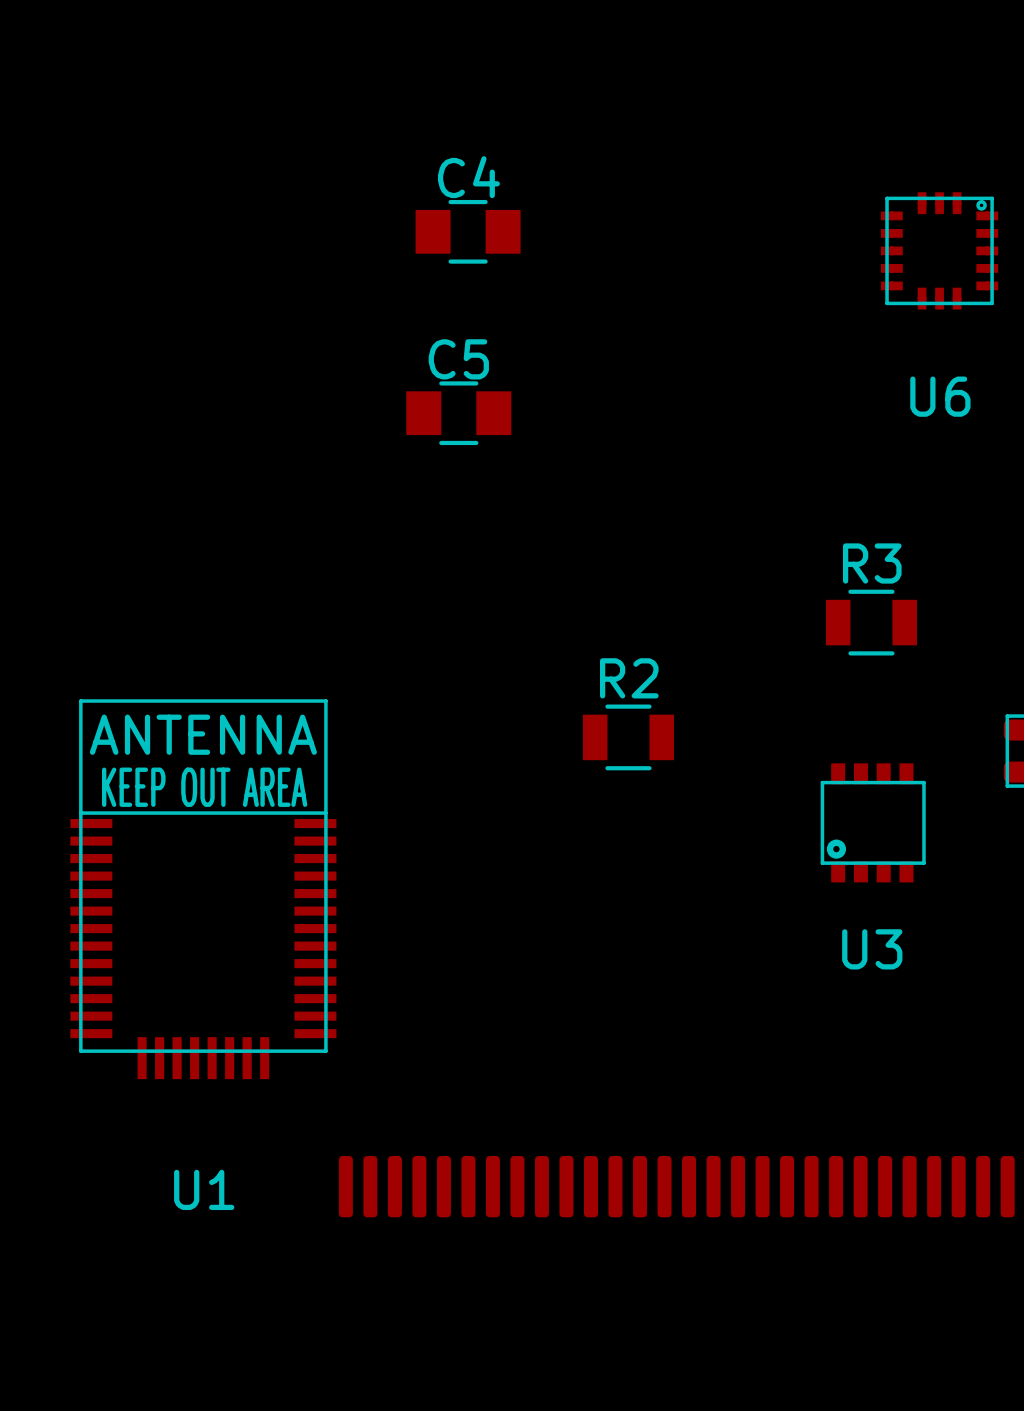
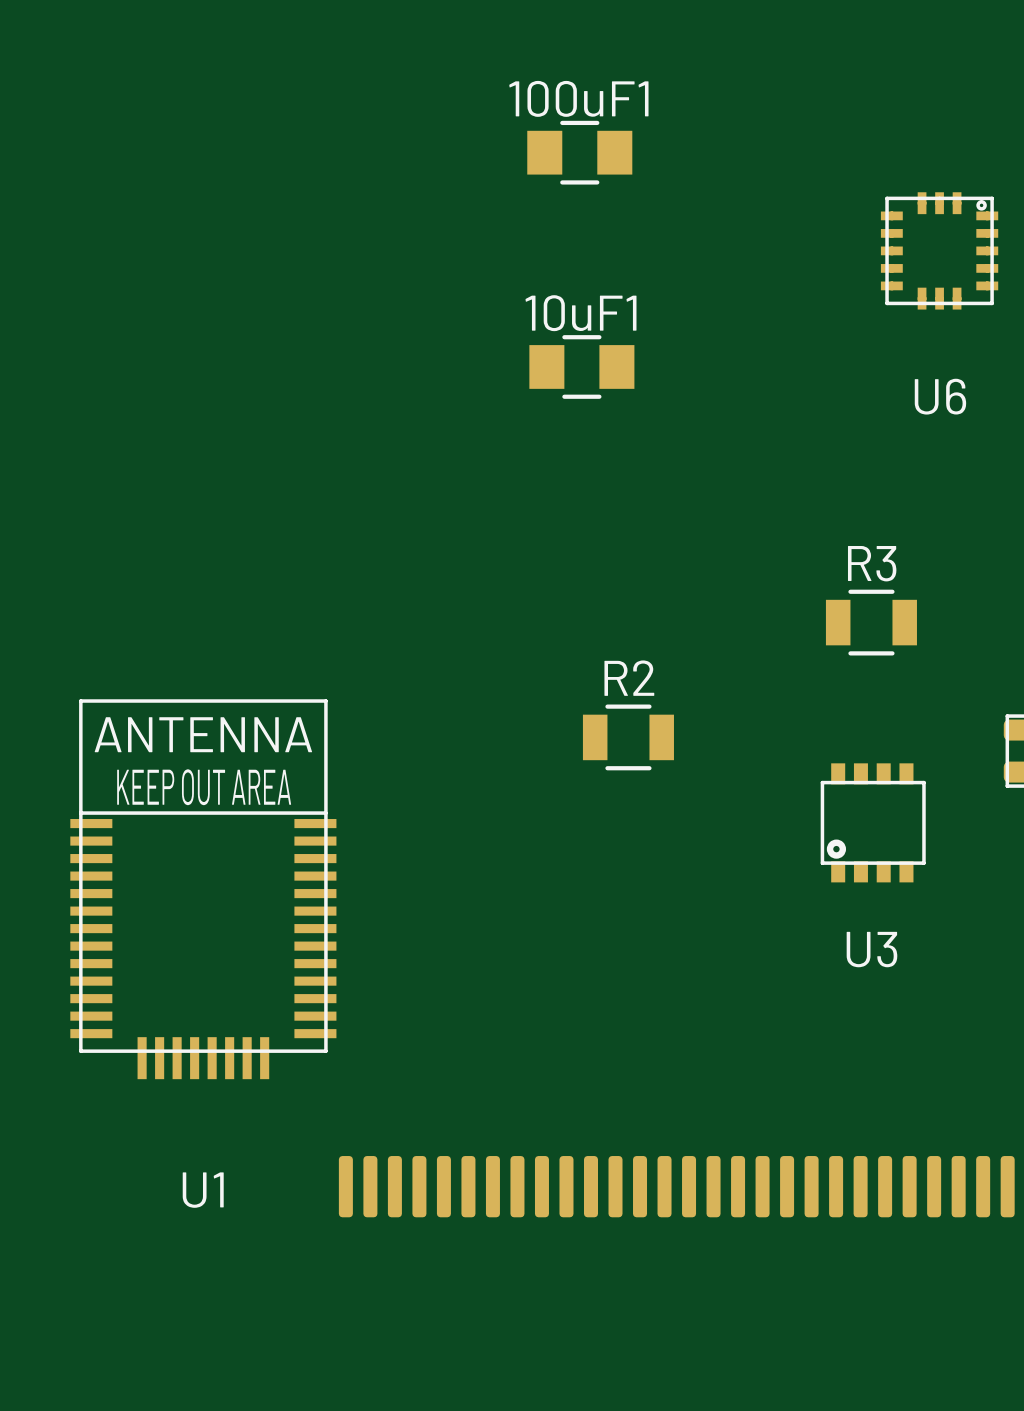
100uF1: none -> (579, 152)
C4: (468, 231) -> none
10uF1: none -> (581, 366)
C5: (458, 413) -> none

